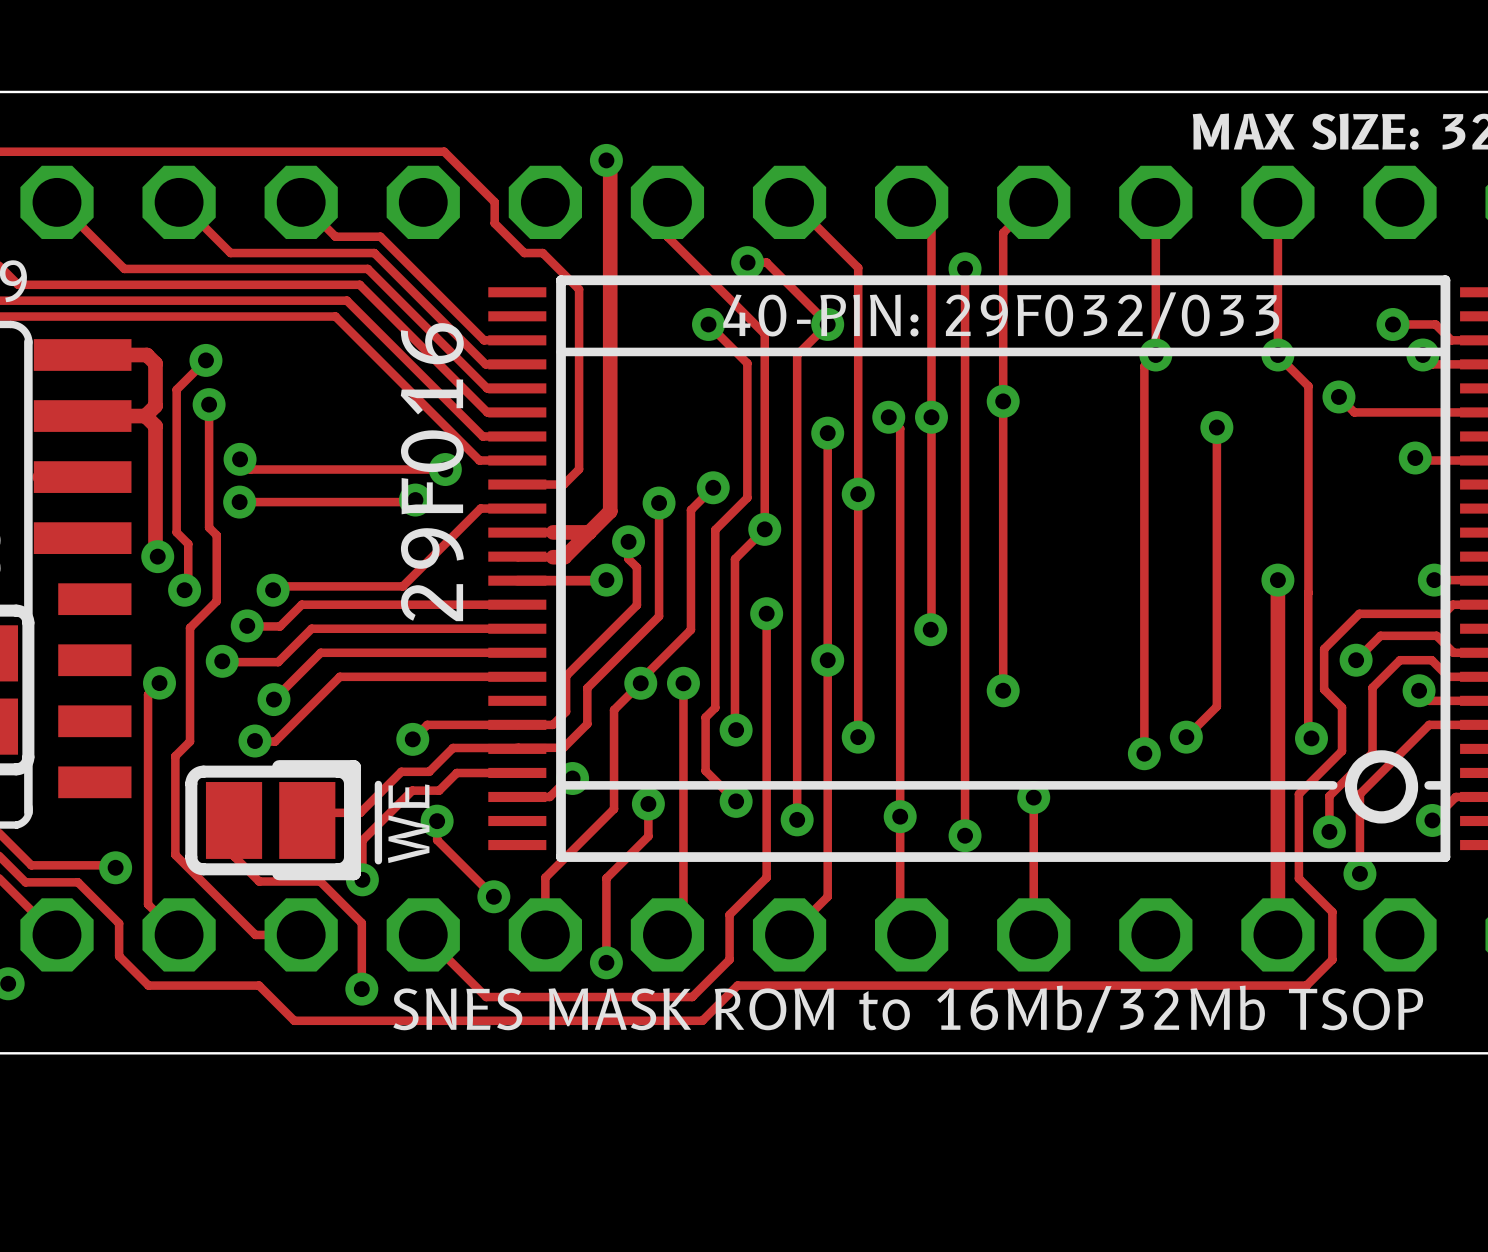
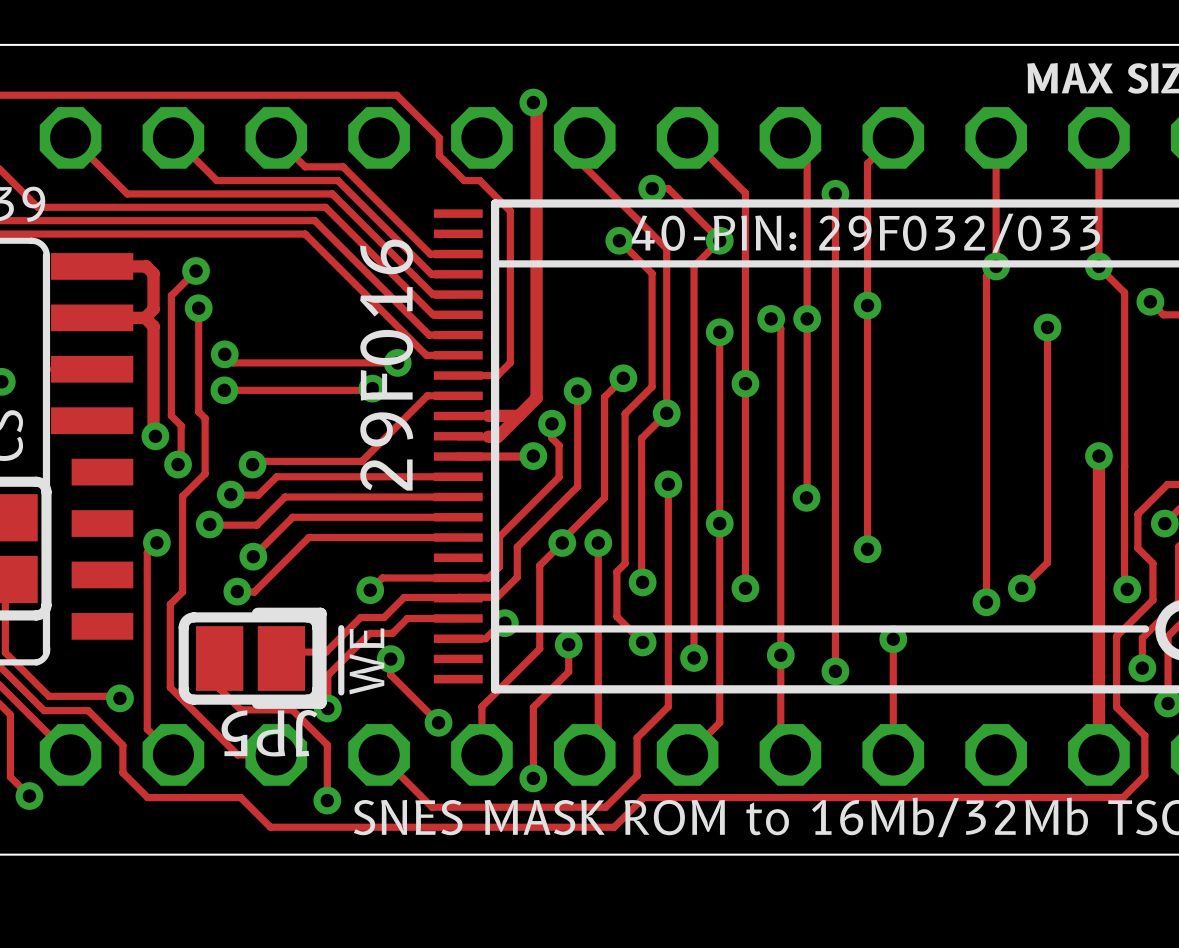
JP5 name: none -> JP5 (269, 733)

